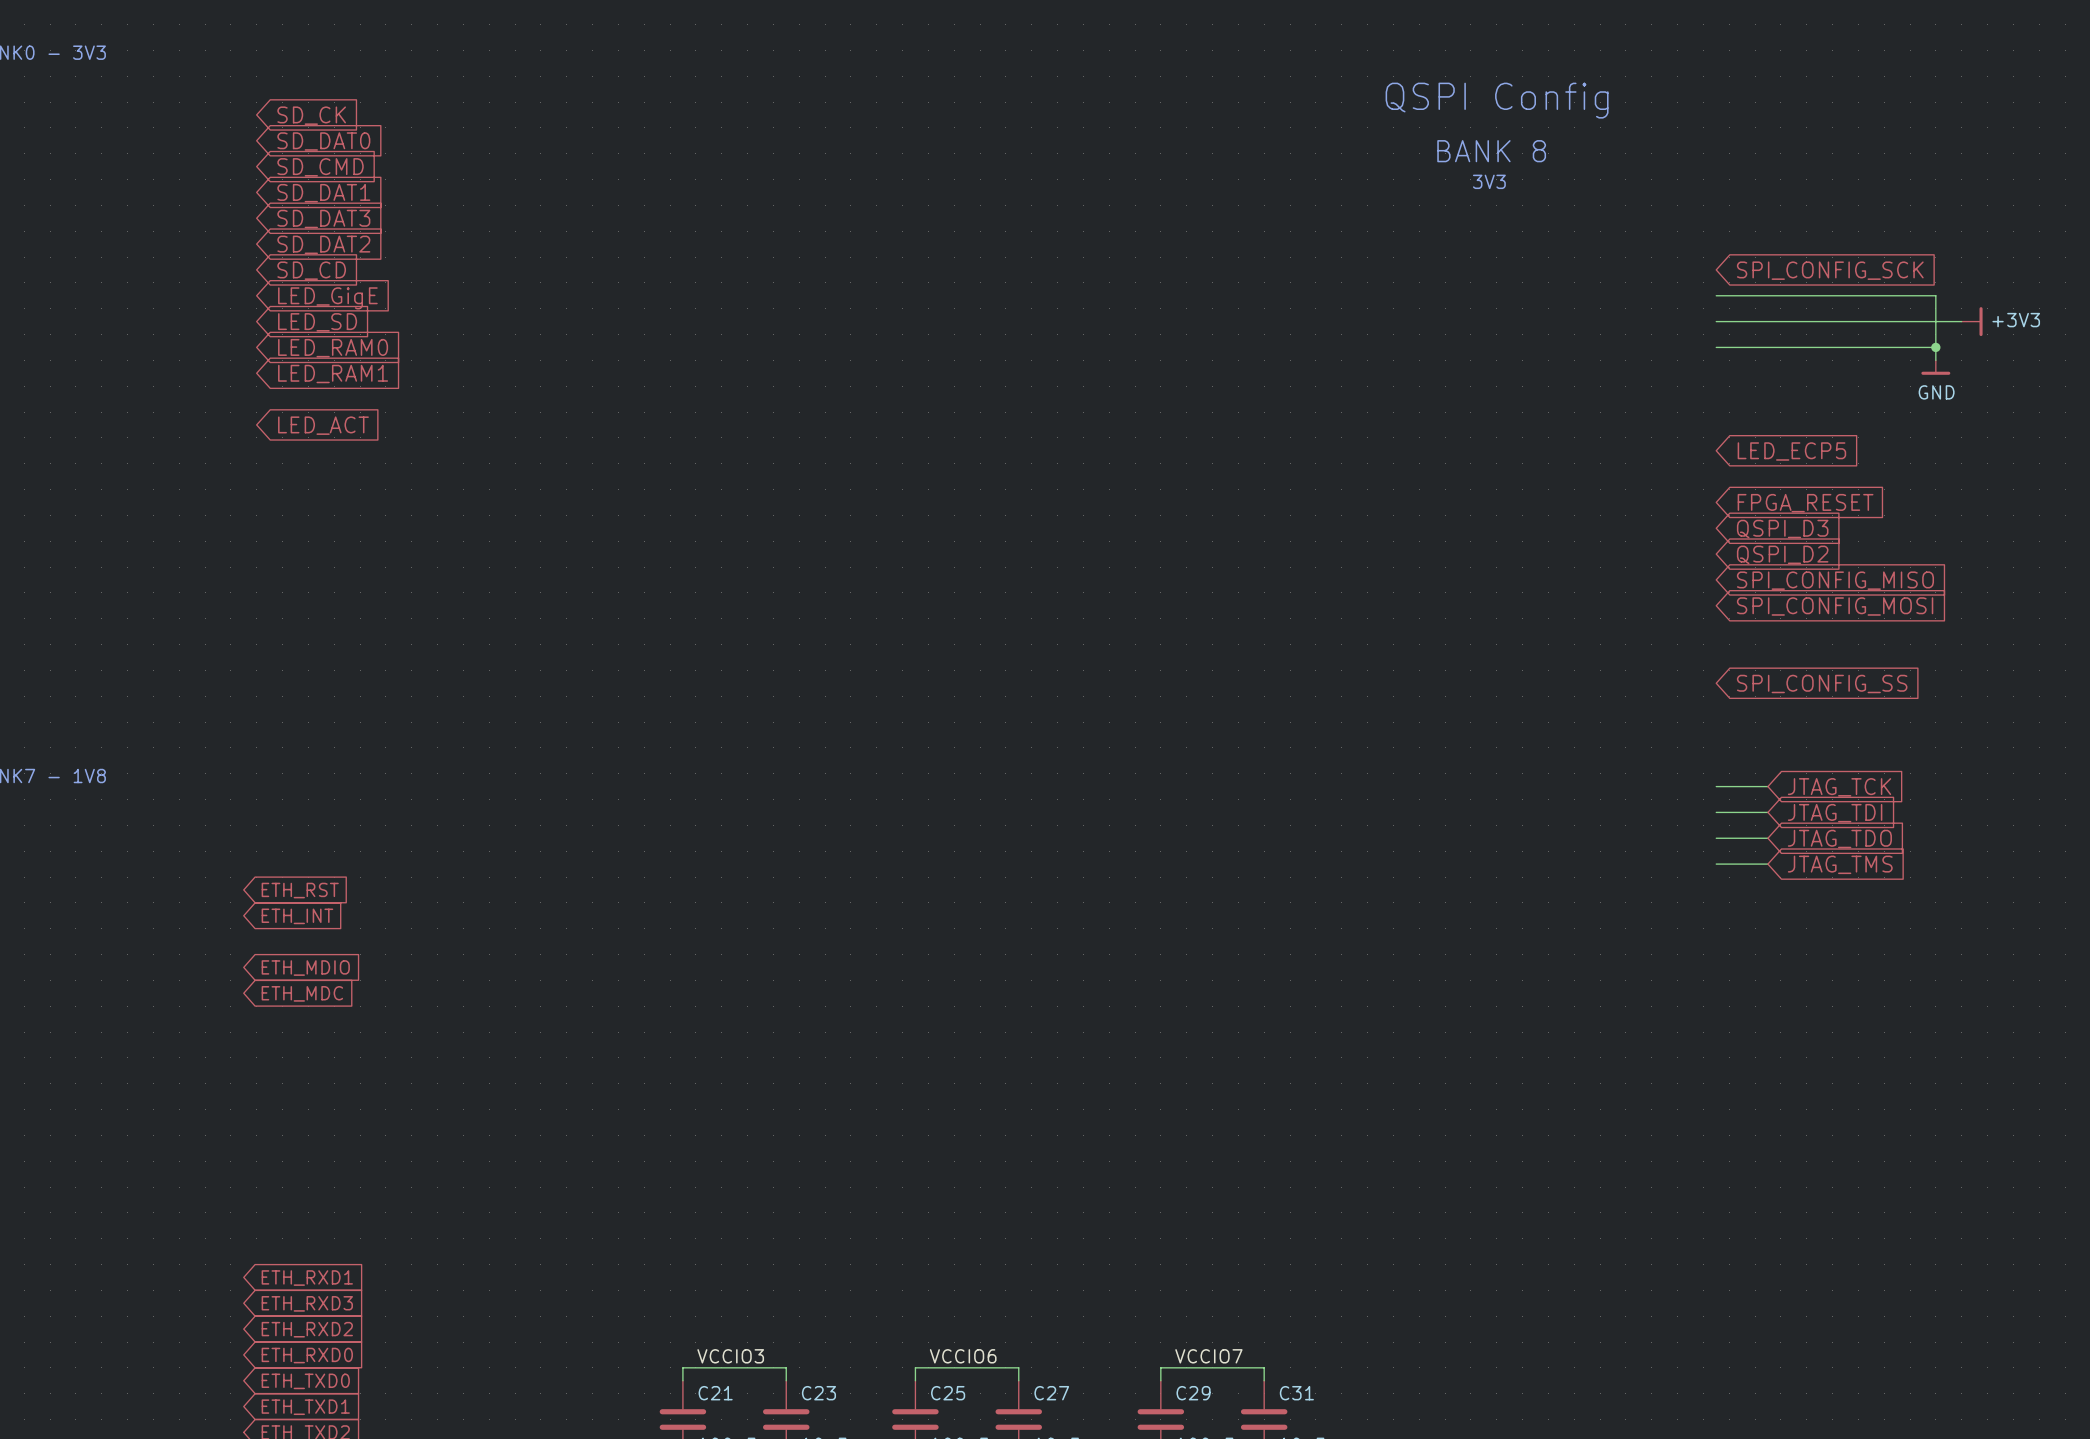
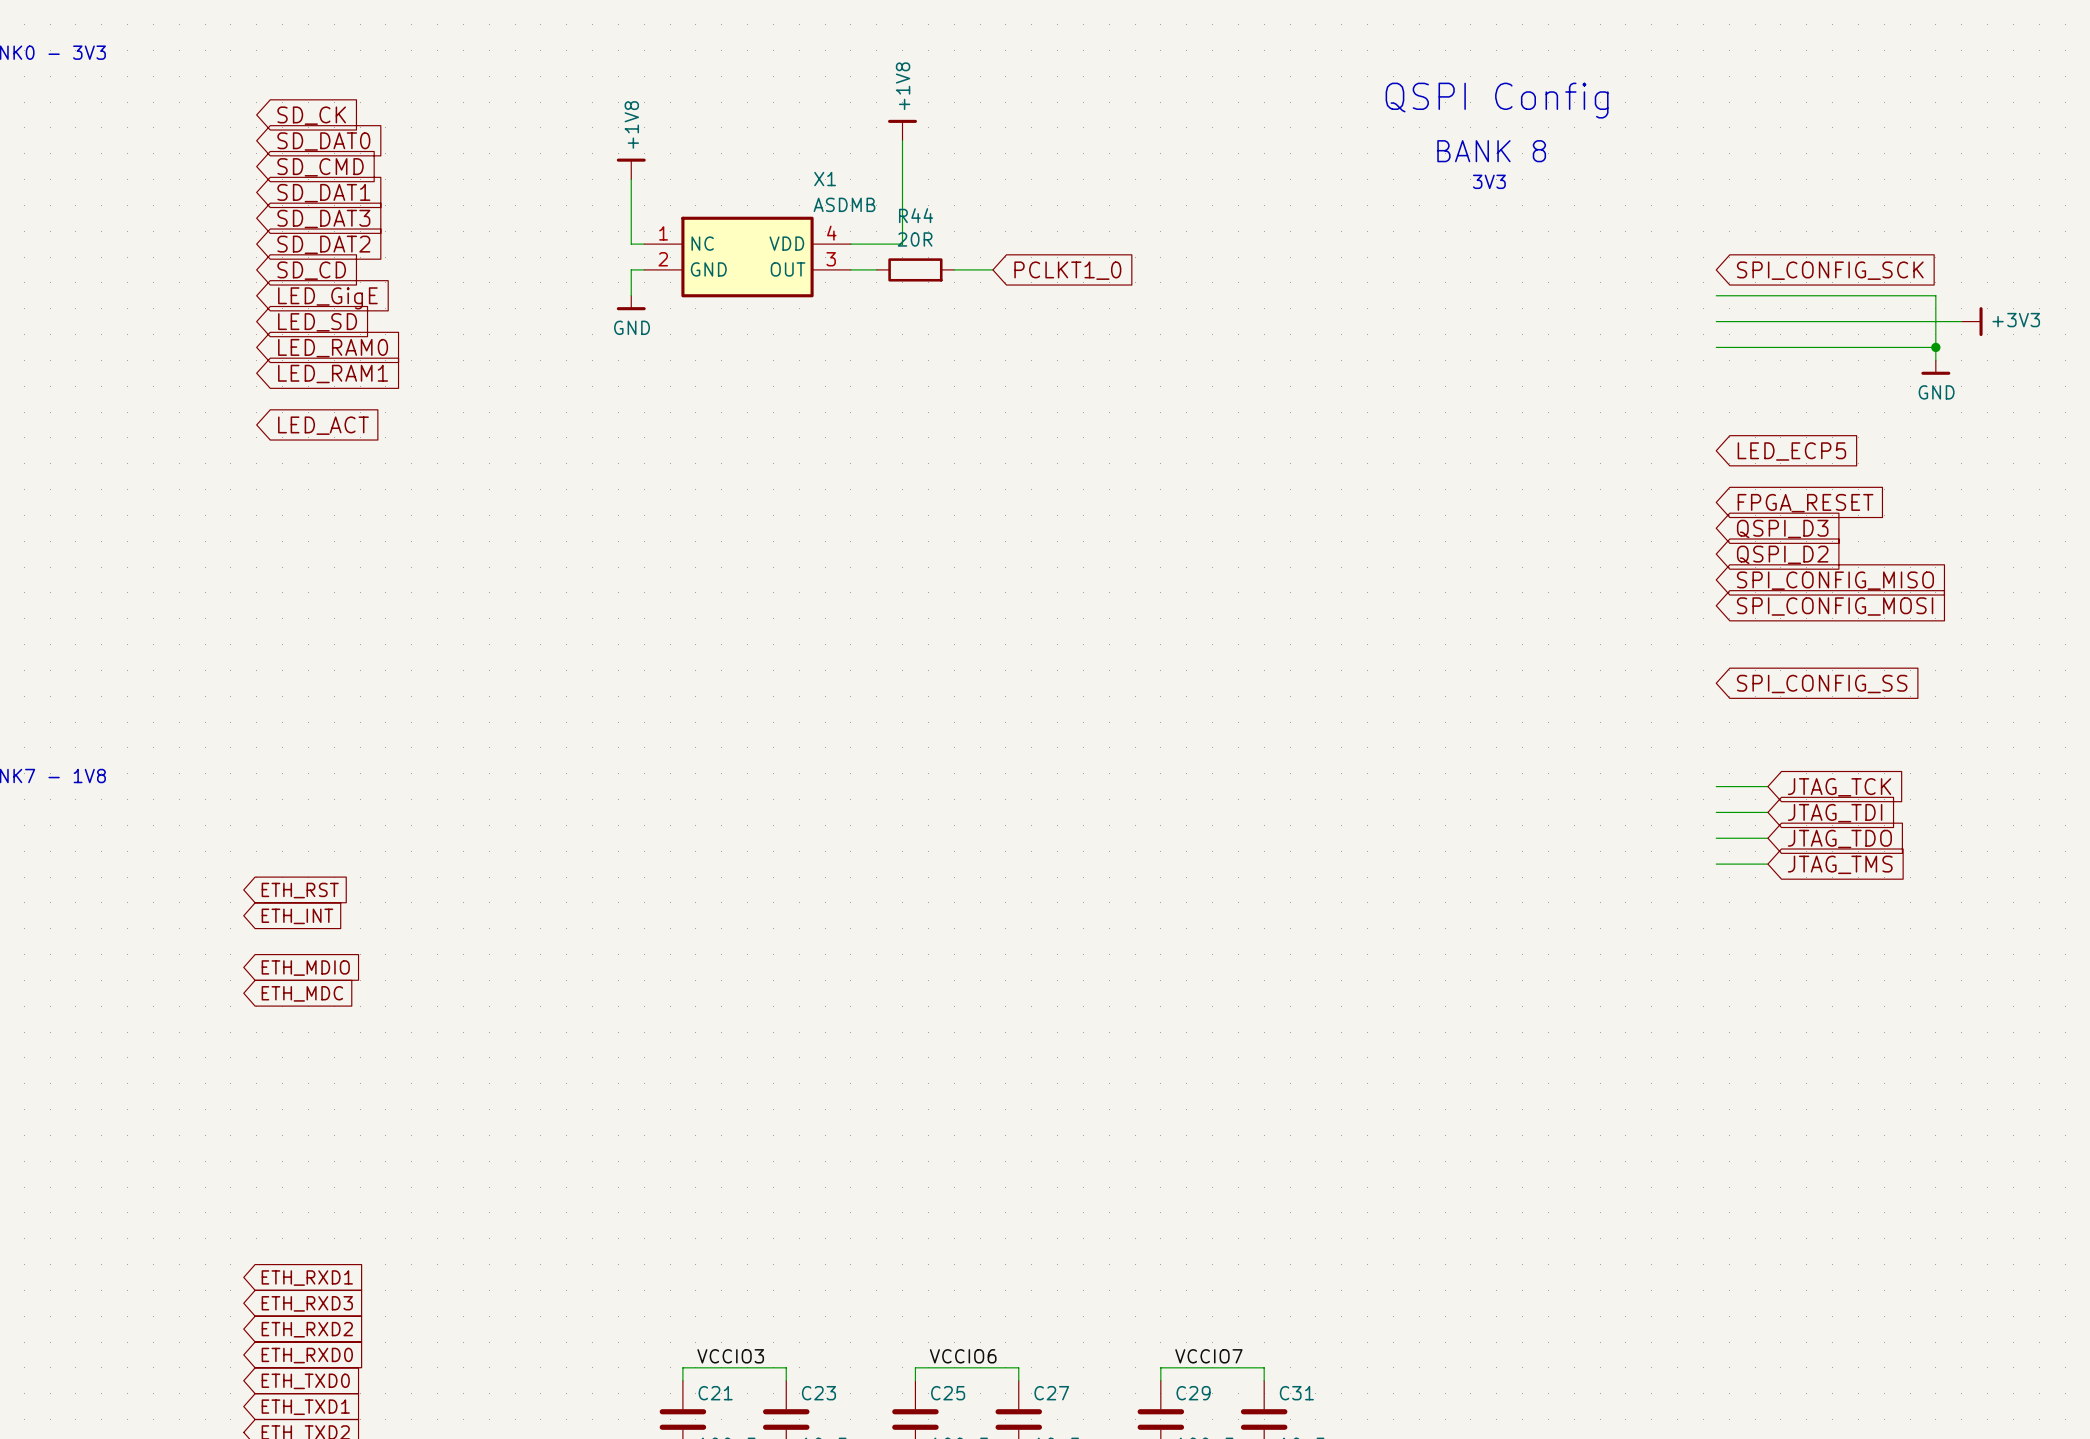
power symbol: none -> +1V8 (902, 130)
wire: none -> (902, 140) (902, 244) (850, 244)
power symbol: none -> +1V8 (631, 169)
wire: none -> (631, 179) (631, 244) (644, 244)
X1: none -> ASDMB (747, 257)
wire: none -> (644, 269) (631, 269) (631, 295)
wire: none -> (850, 269) (876, 269)
R44: none -> 20R (915, 269)
wire: none -> (954, 269) (992, 269)
global label: none -> PCLKT1_0 (1067, 270)
power symbol: none -> GND (631, 302)

